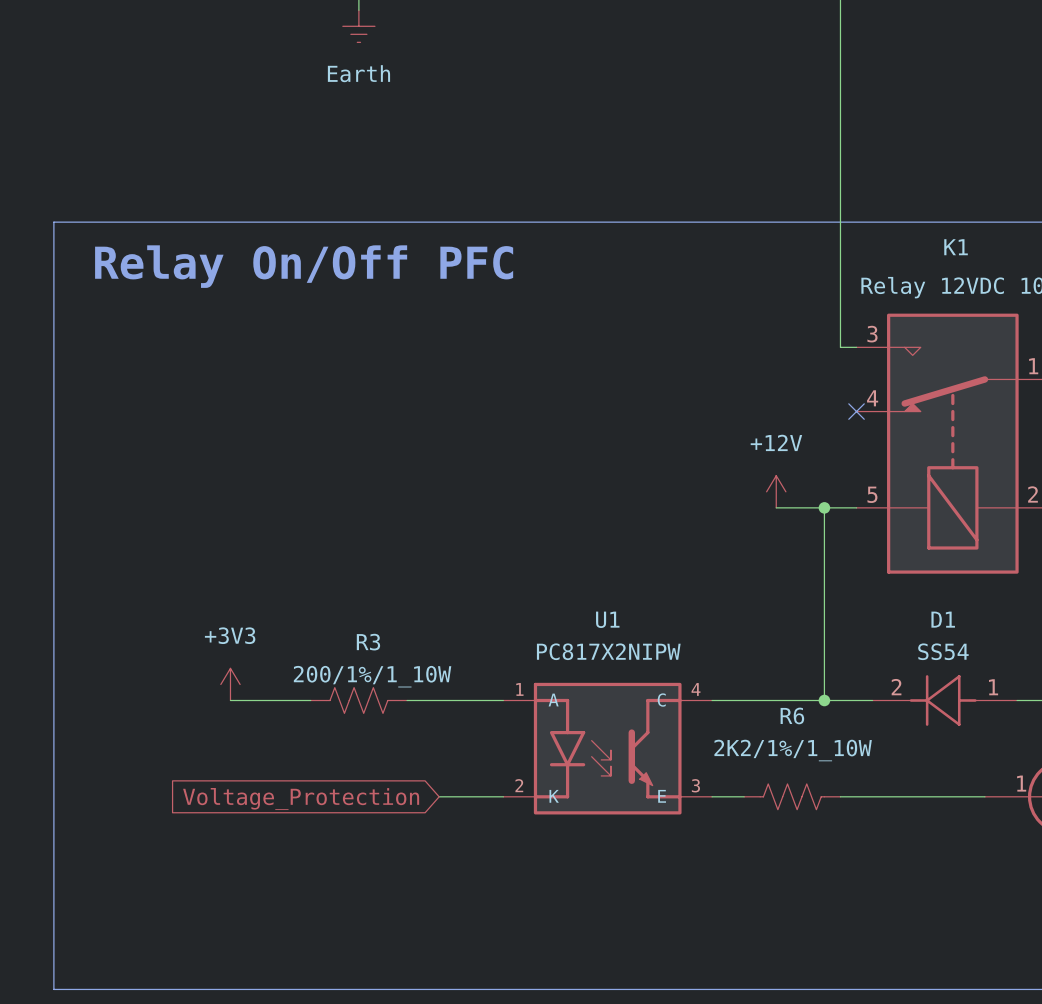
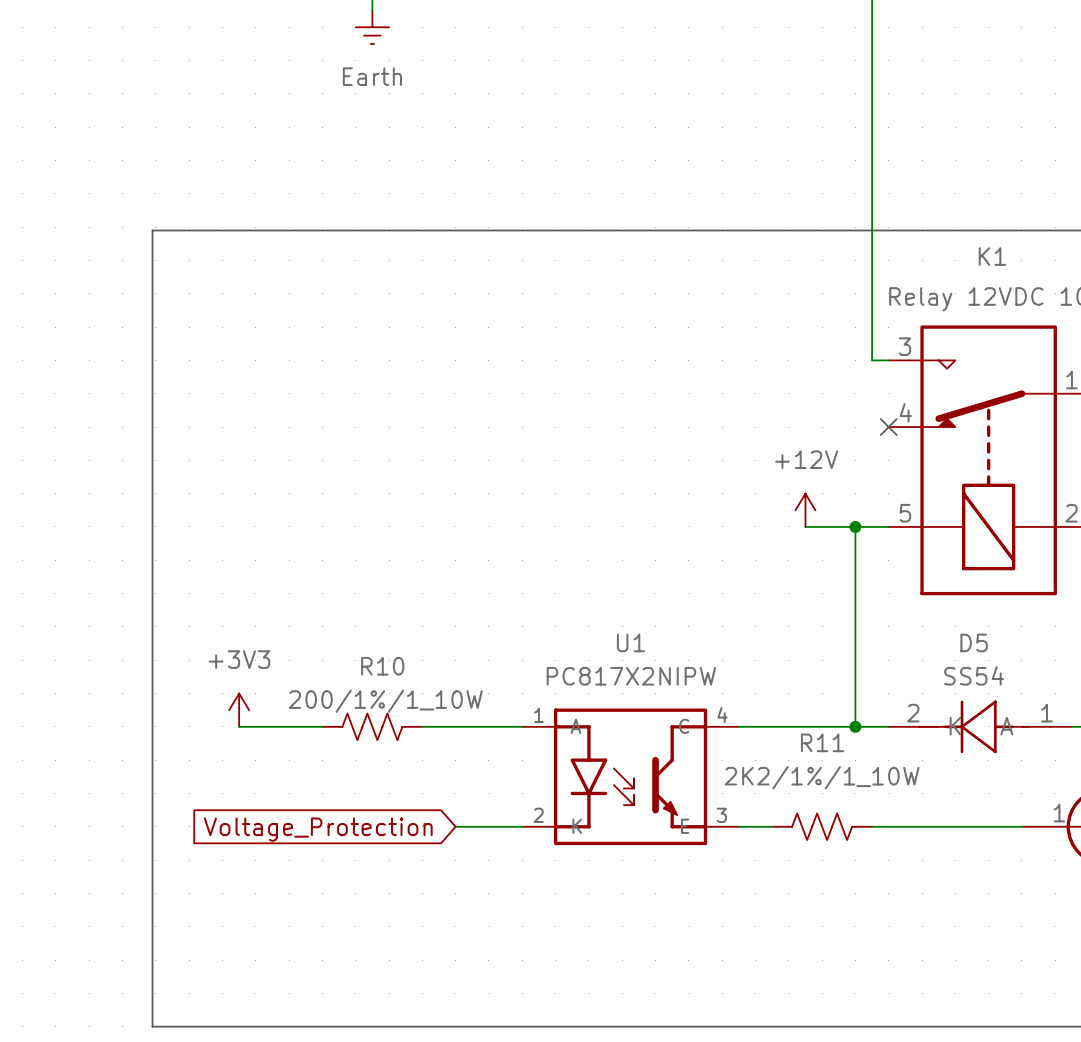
line: (147, 222) (53, 222) (53, 989) (147, 989) -> (152, 230) (152, 1026)
text: Relay On/Off PFC (304, 266) -> none
R3 name: R3 (368, 642) -> R10 (382, 666)
D1: SS54 (944, 700) -> none
D5: none -> SS54 (980, 726)
R6 name: R6 (792, 715) -> R11 (822, 742)

